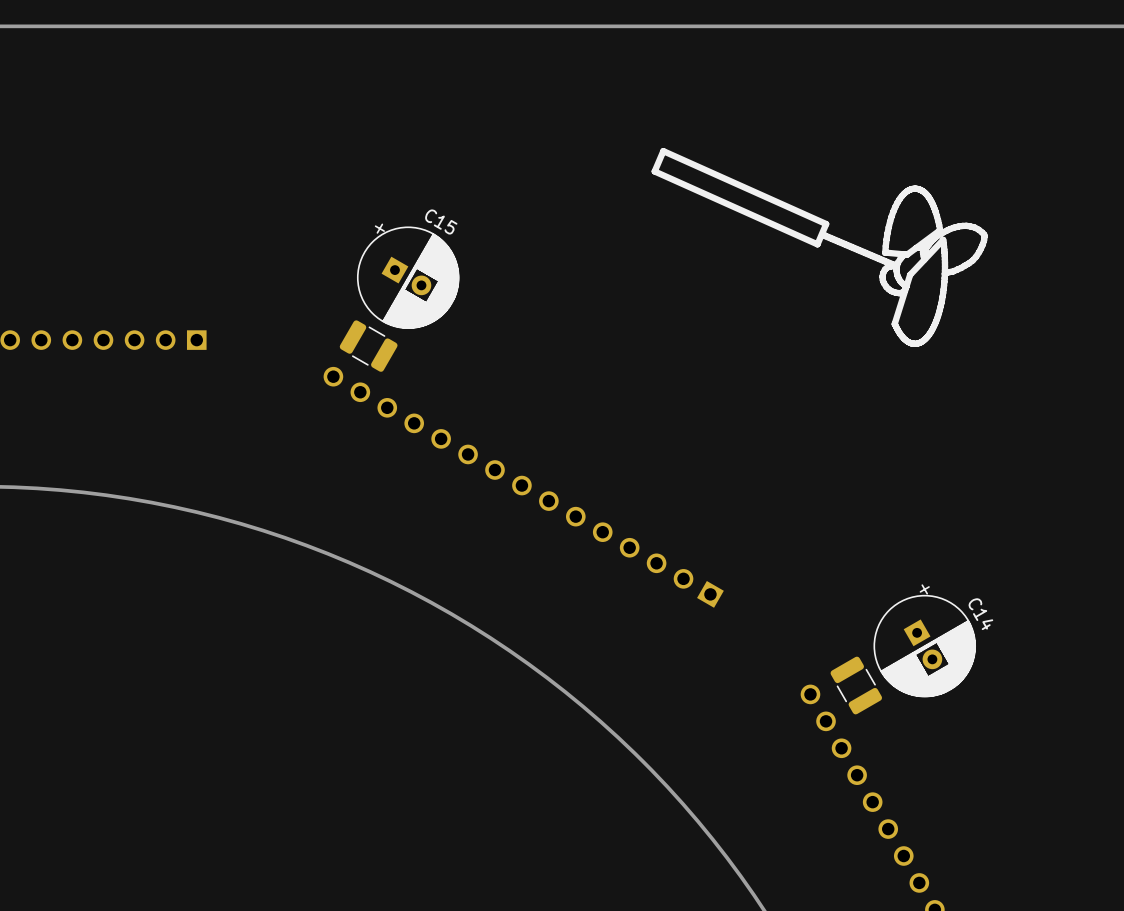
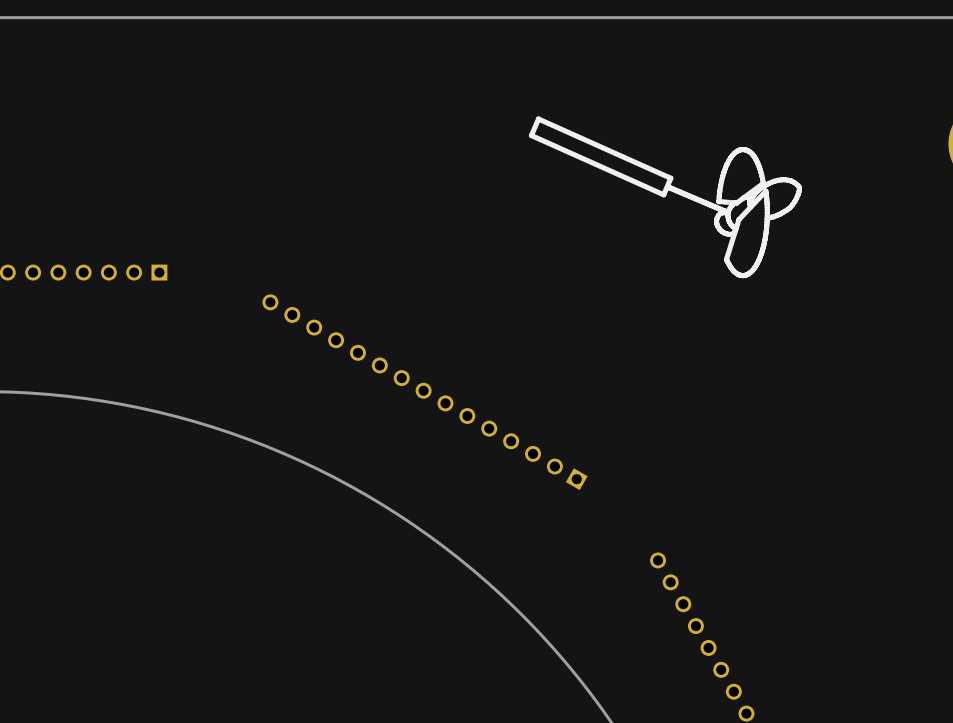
C15: (408, 276) -> none
part: (368, 346) -> none
C14: (924, 640) -> none
part: (856, 685) -> none

